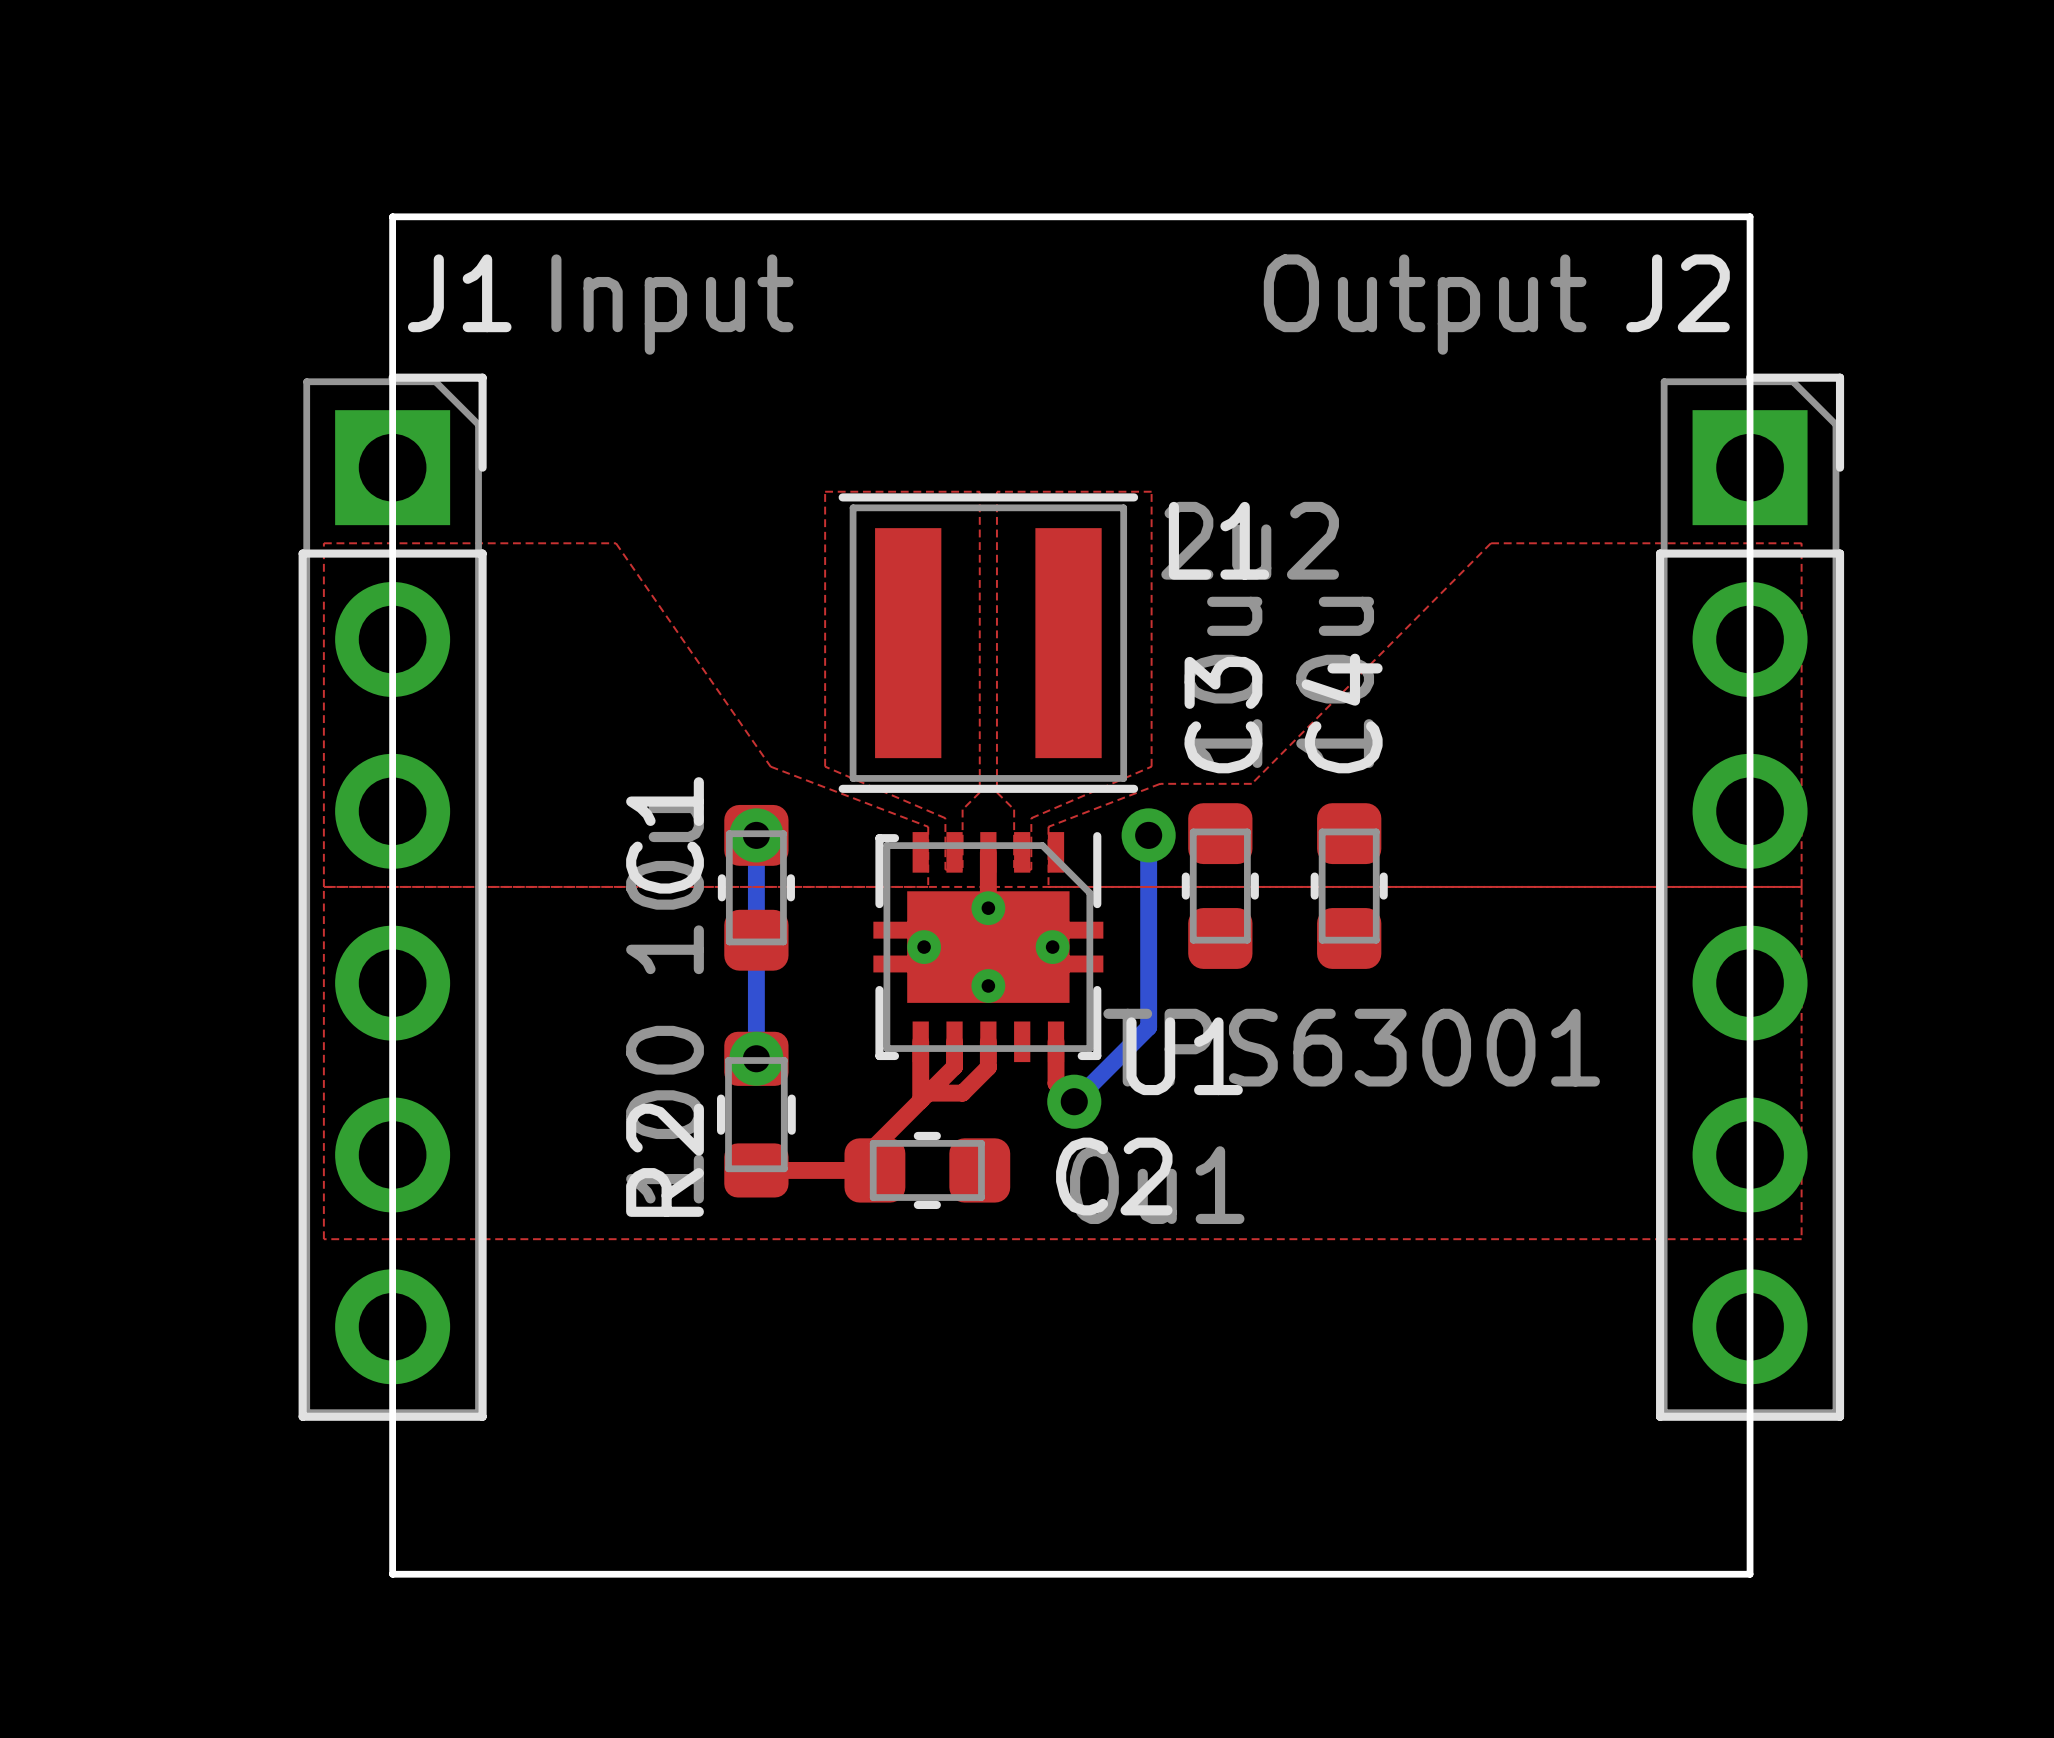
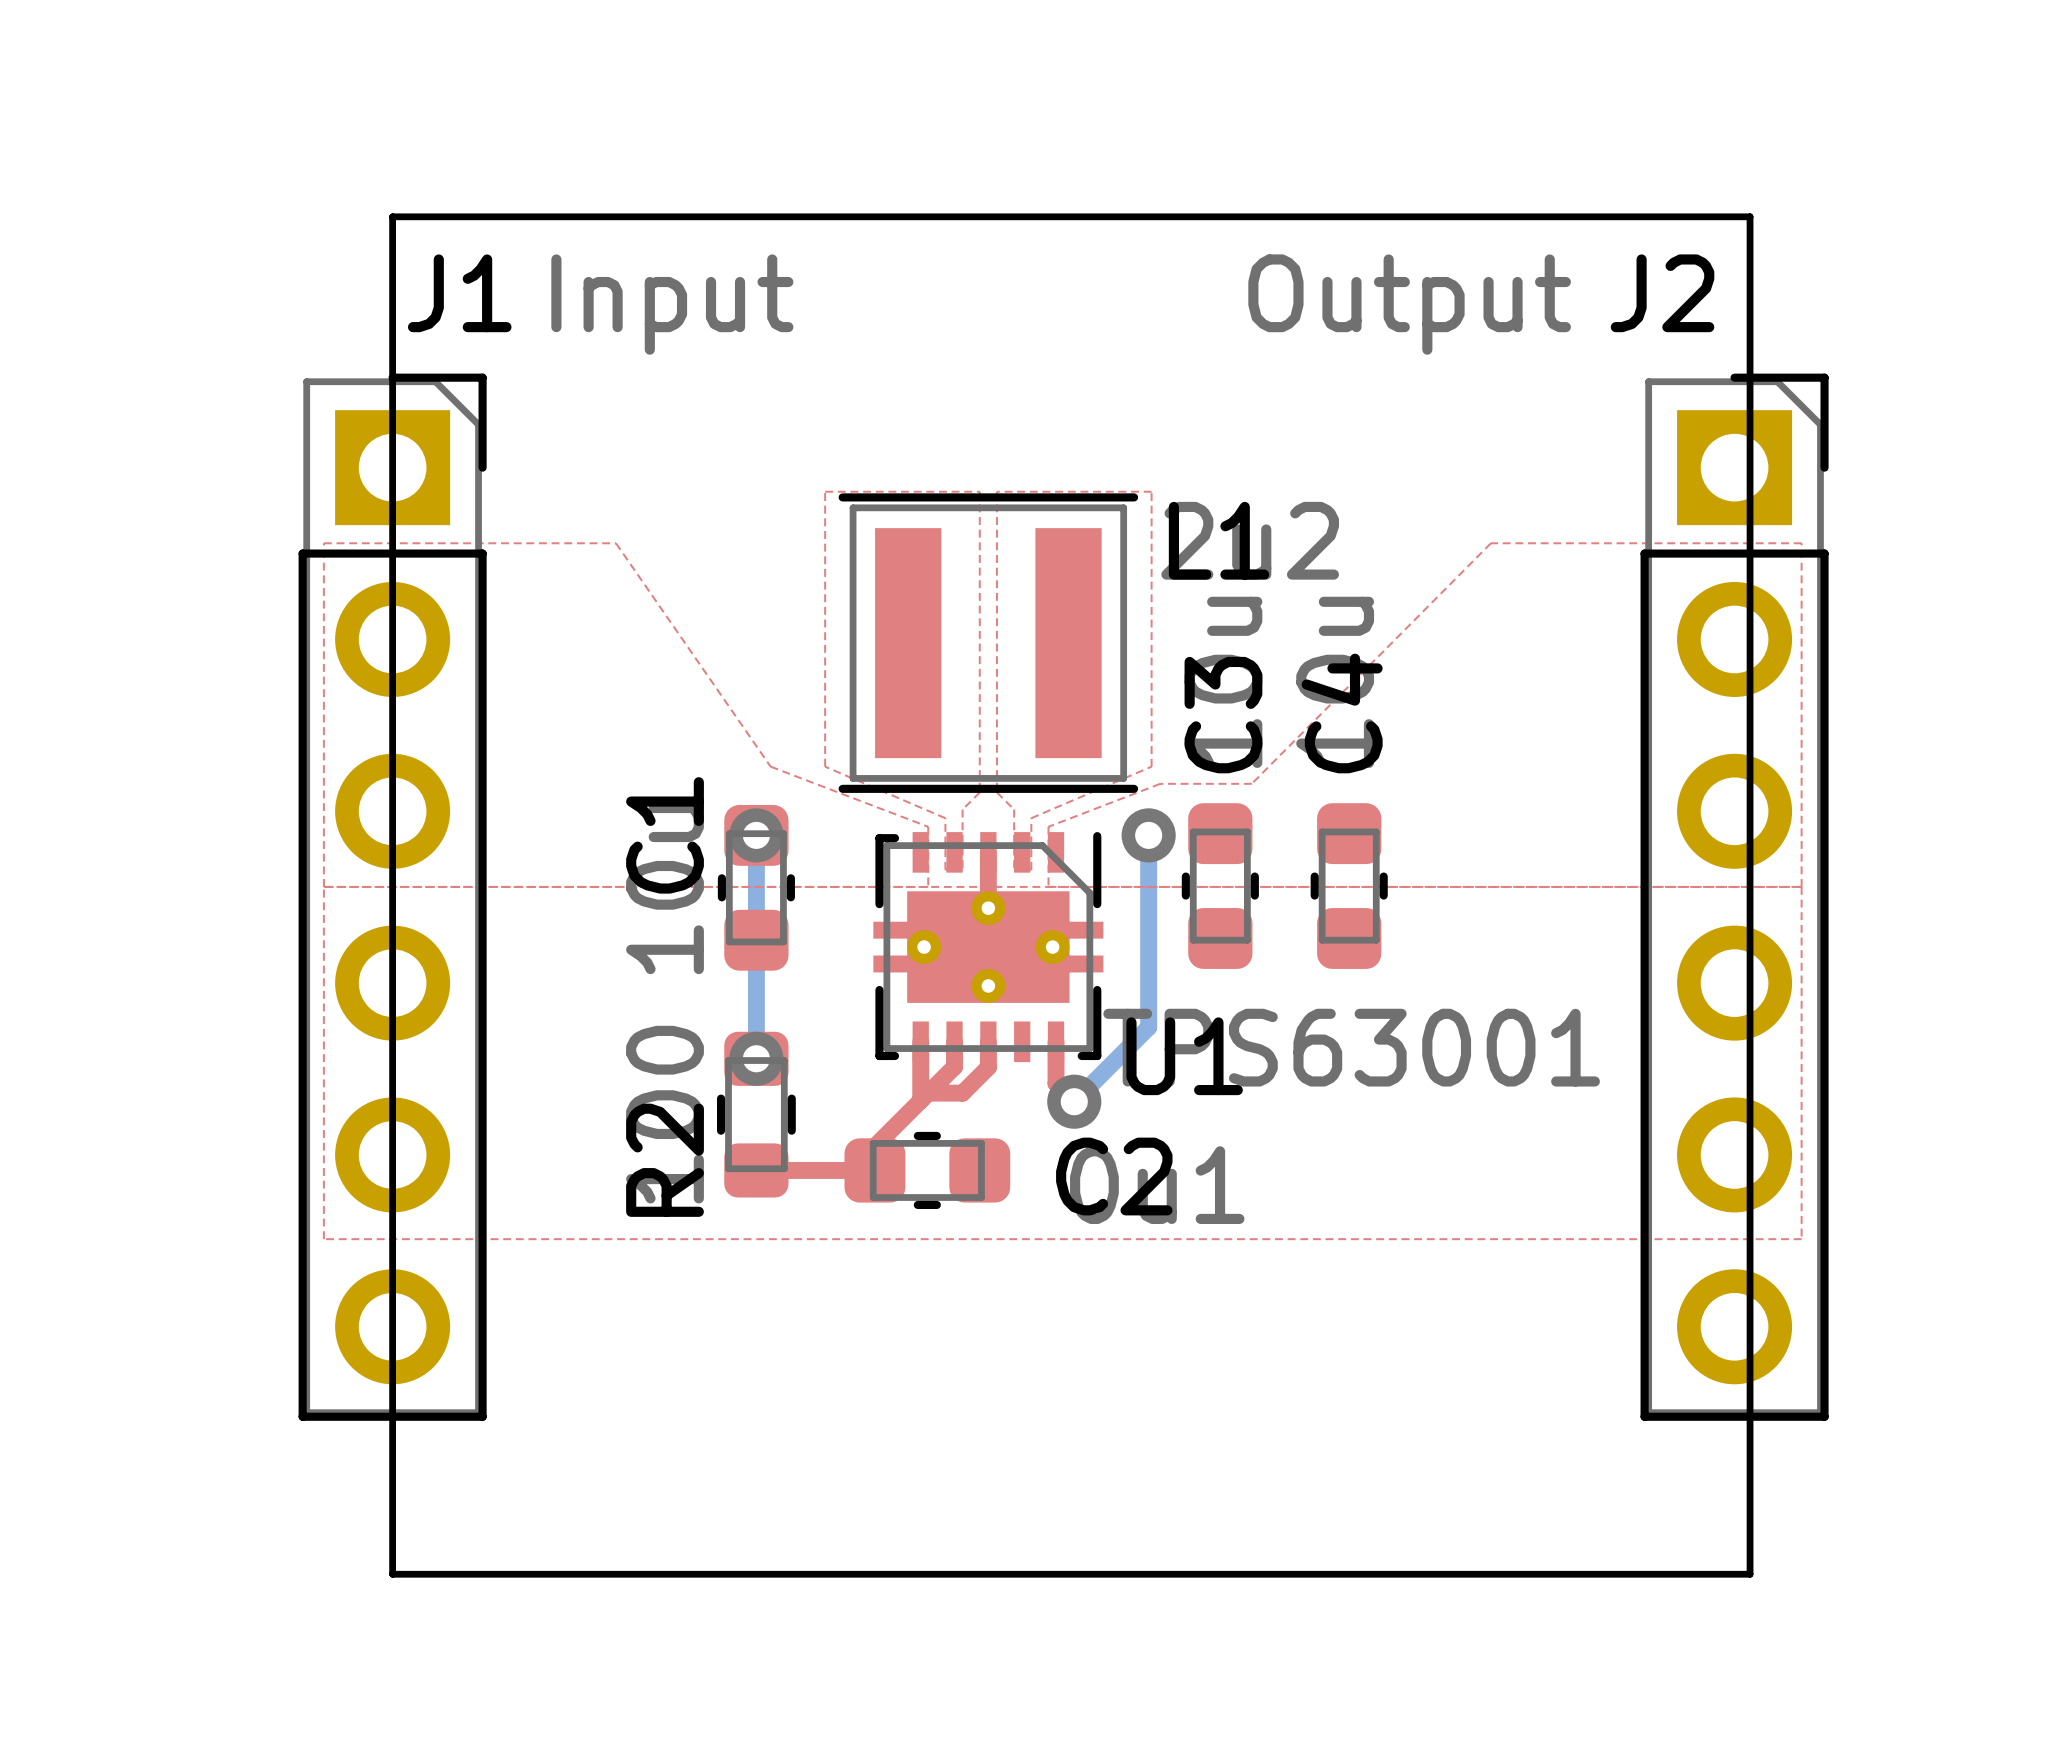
J2 position: (1750, 897) -> (1734, 897)

